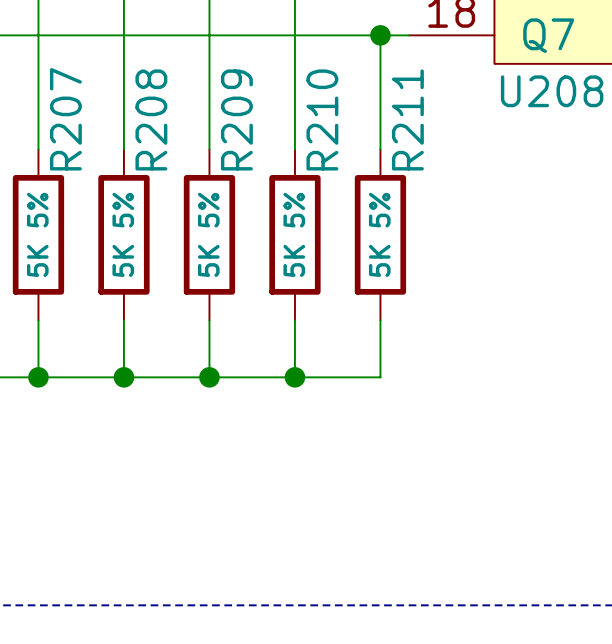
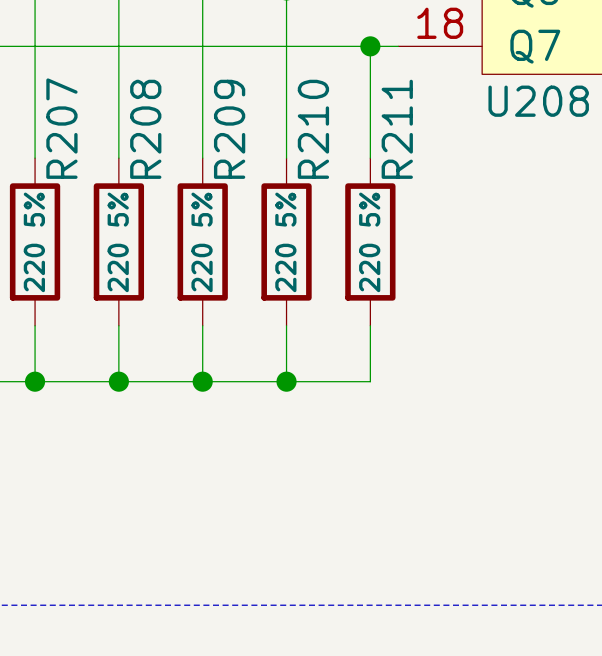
R207 value: 5K 5% (37, 234) -> 220 5% (34, 242)
R208 value: 5K 5% (123, 234) -> 220 5% (118, 242)
R209 value: 5K 5% (208, 234) -> 220 5% (202, 242)
R210 value: 5K 5% (294, 234) -> 220 5% (285, 242)
R211 value: 5K 5% (379, 234) -> 220 5% (369, 242)

